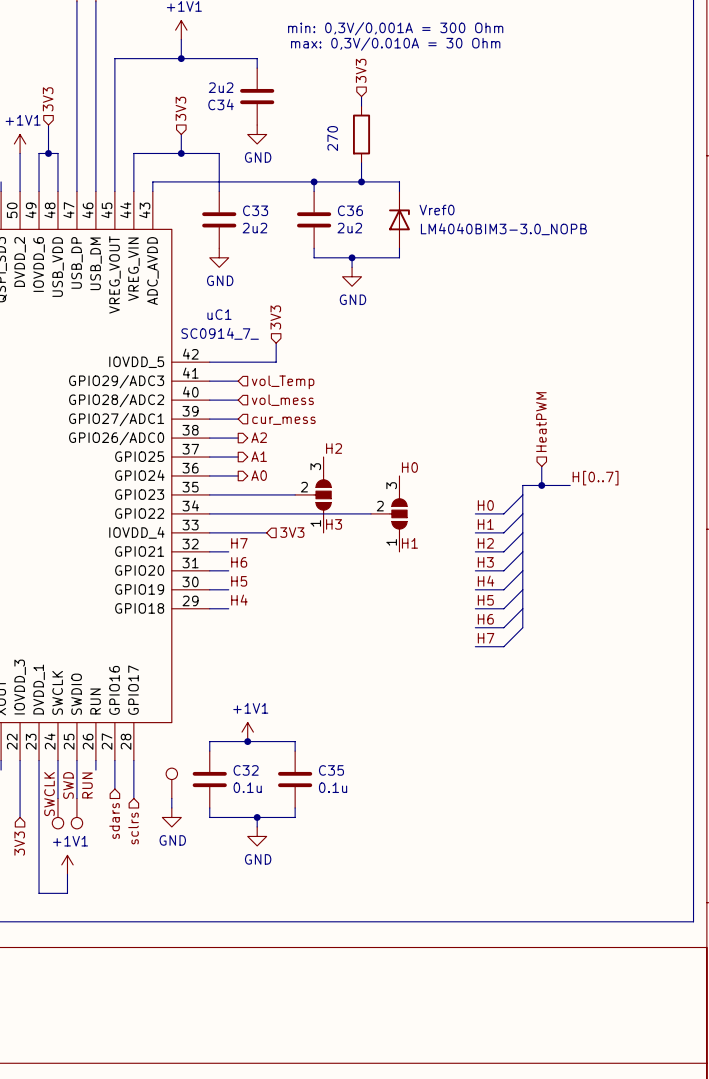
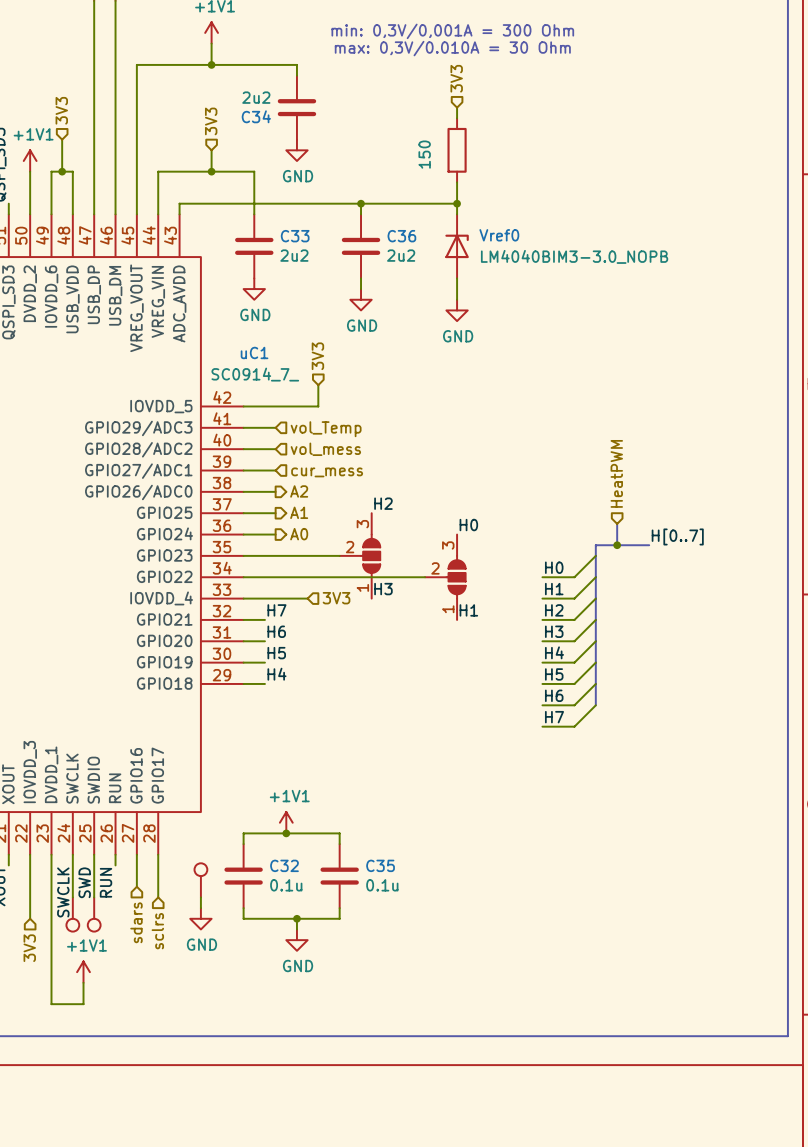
hierarchical label position: 3V3 (361, 70) -> 3V3 (456, 78)
wire: (361, 96) (361, 106) -> (457, 107) (457, 118)
part: 270 (361, 134) -> none
part: none -> 150 (457, 150)
wire: (361, 162) (361, 181) -> (457, 182) (457, 203)
junction position: (361, 181) -> (457, 203)
wire: (314, 257) (399, 257) -> (457, 299) (457, 289)
wire: (352, 257) (352, 267) -> none
junction: (352, 257) -> none
power symbol: none -> GND (361, 299)
power symbol: GND (352, 276) -> none
power symbol: none -> GND (457, 310)

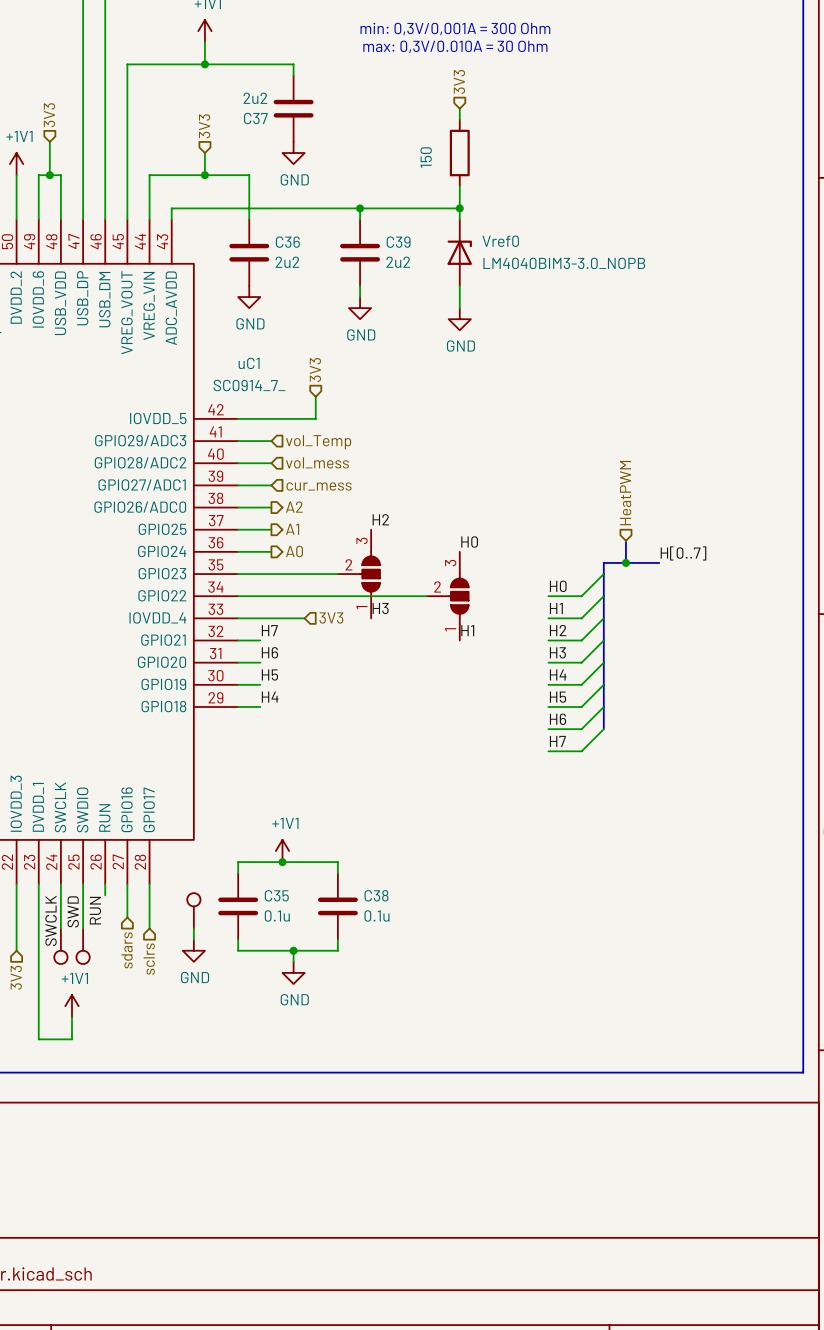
C34 name: C34 (256, 116) -> C37 (255, 118)
C33 name: C33 (295, 236) -> C36 (287, 242)
C36 name: C36 (401, 236) -> C39 (398, 242)
C32 name: C32 (284, 865) -> C35 (276, 895)
C35 name: C35 (380, 865) -> C38 (376, 895)

